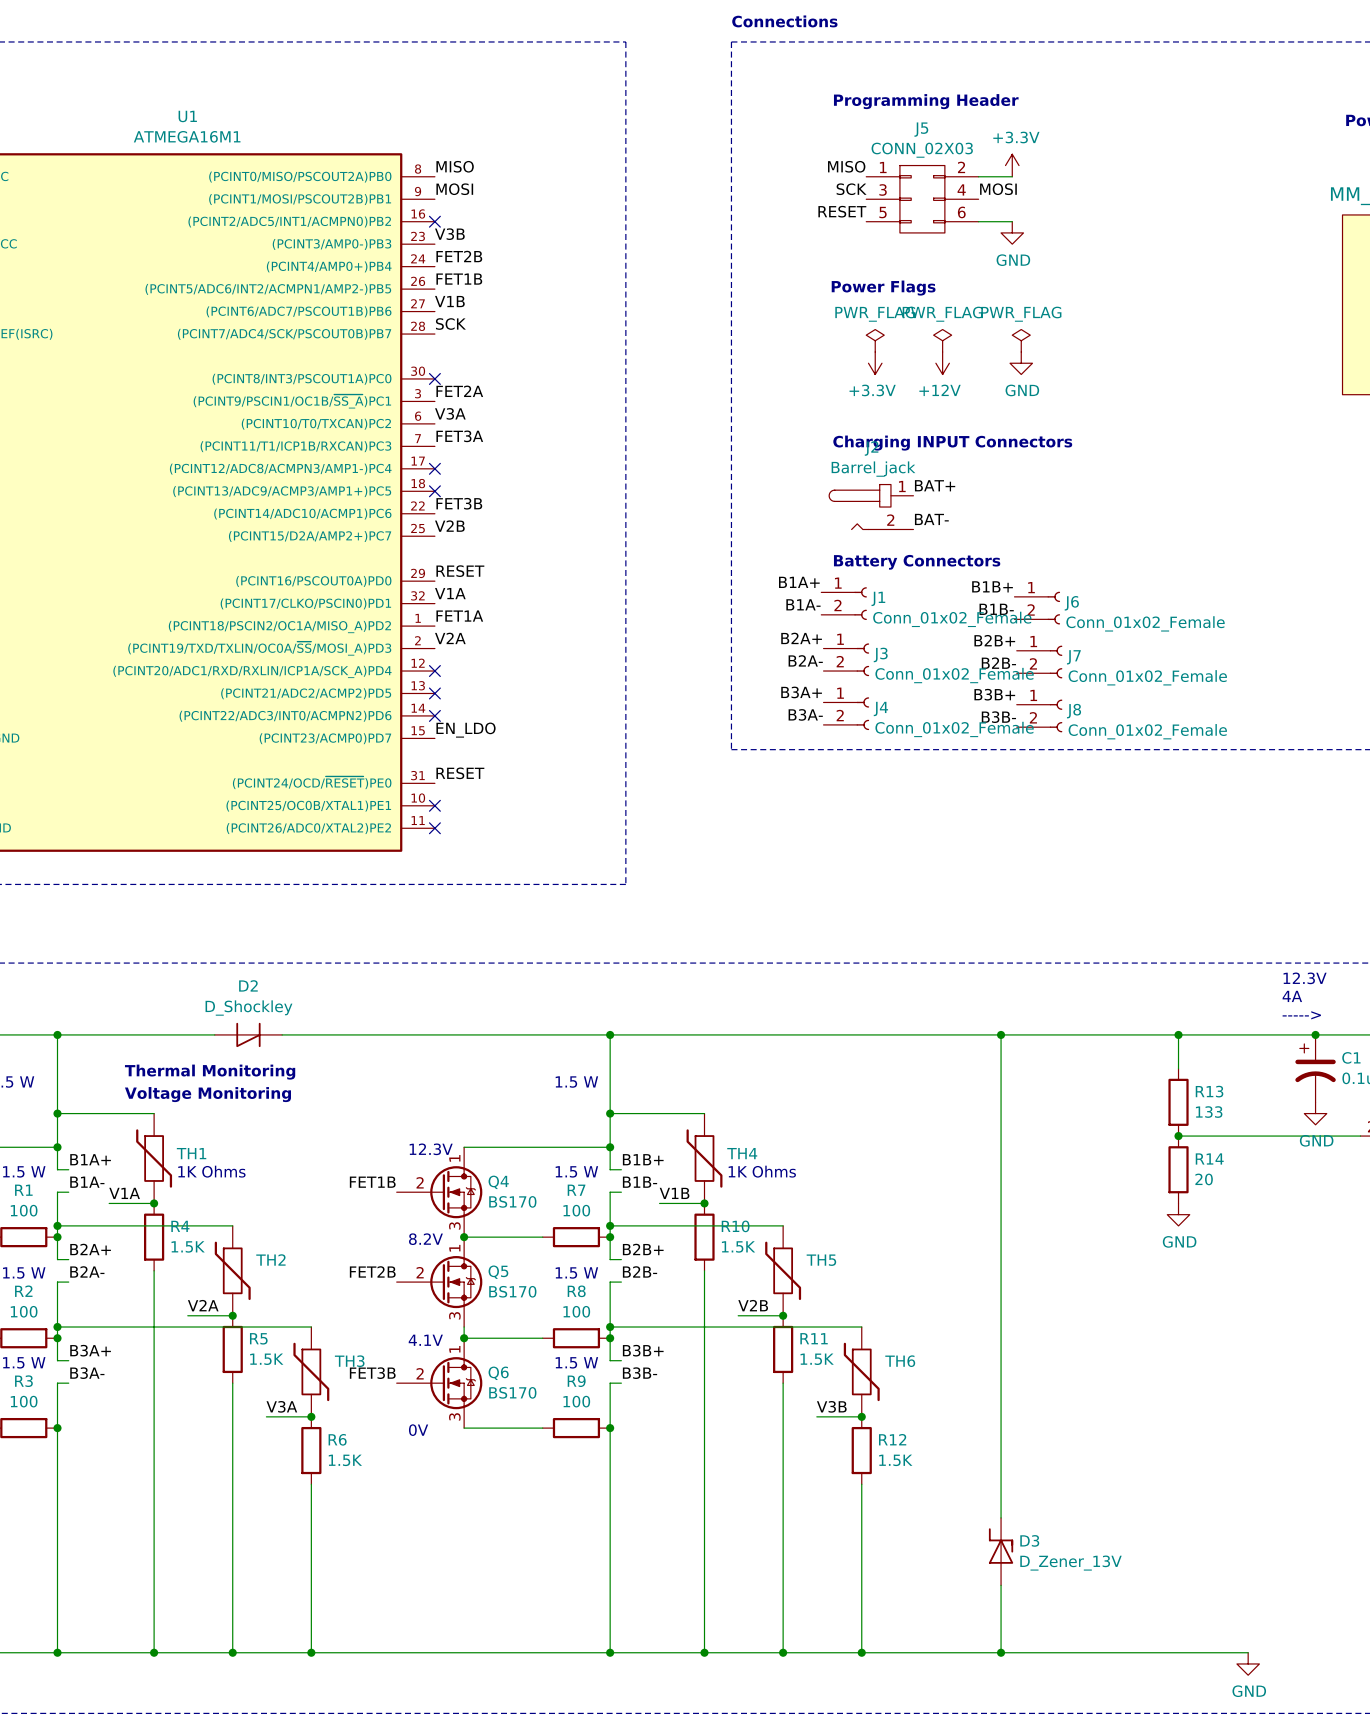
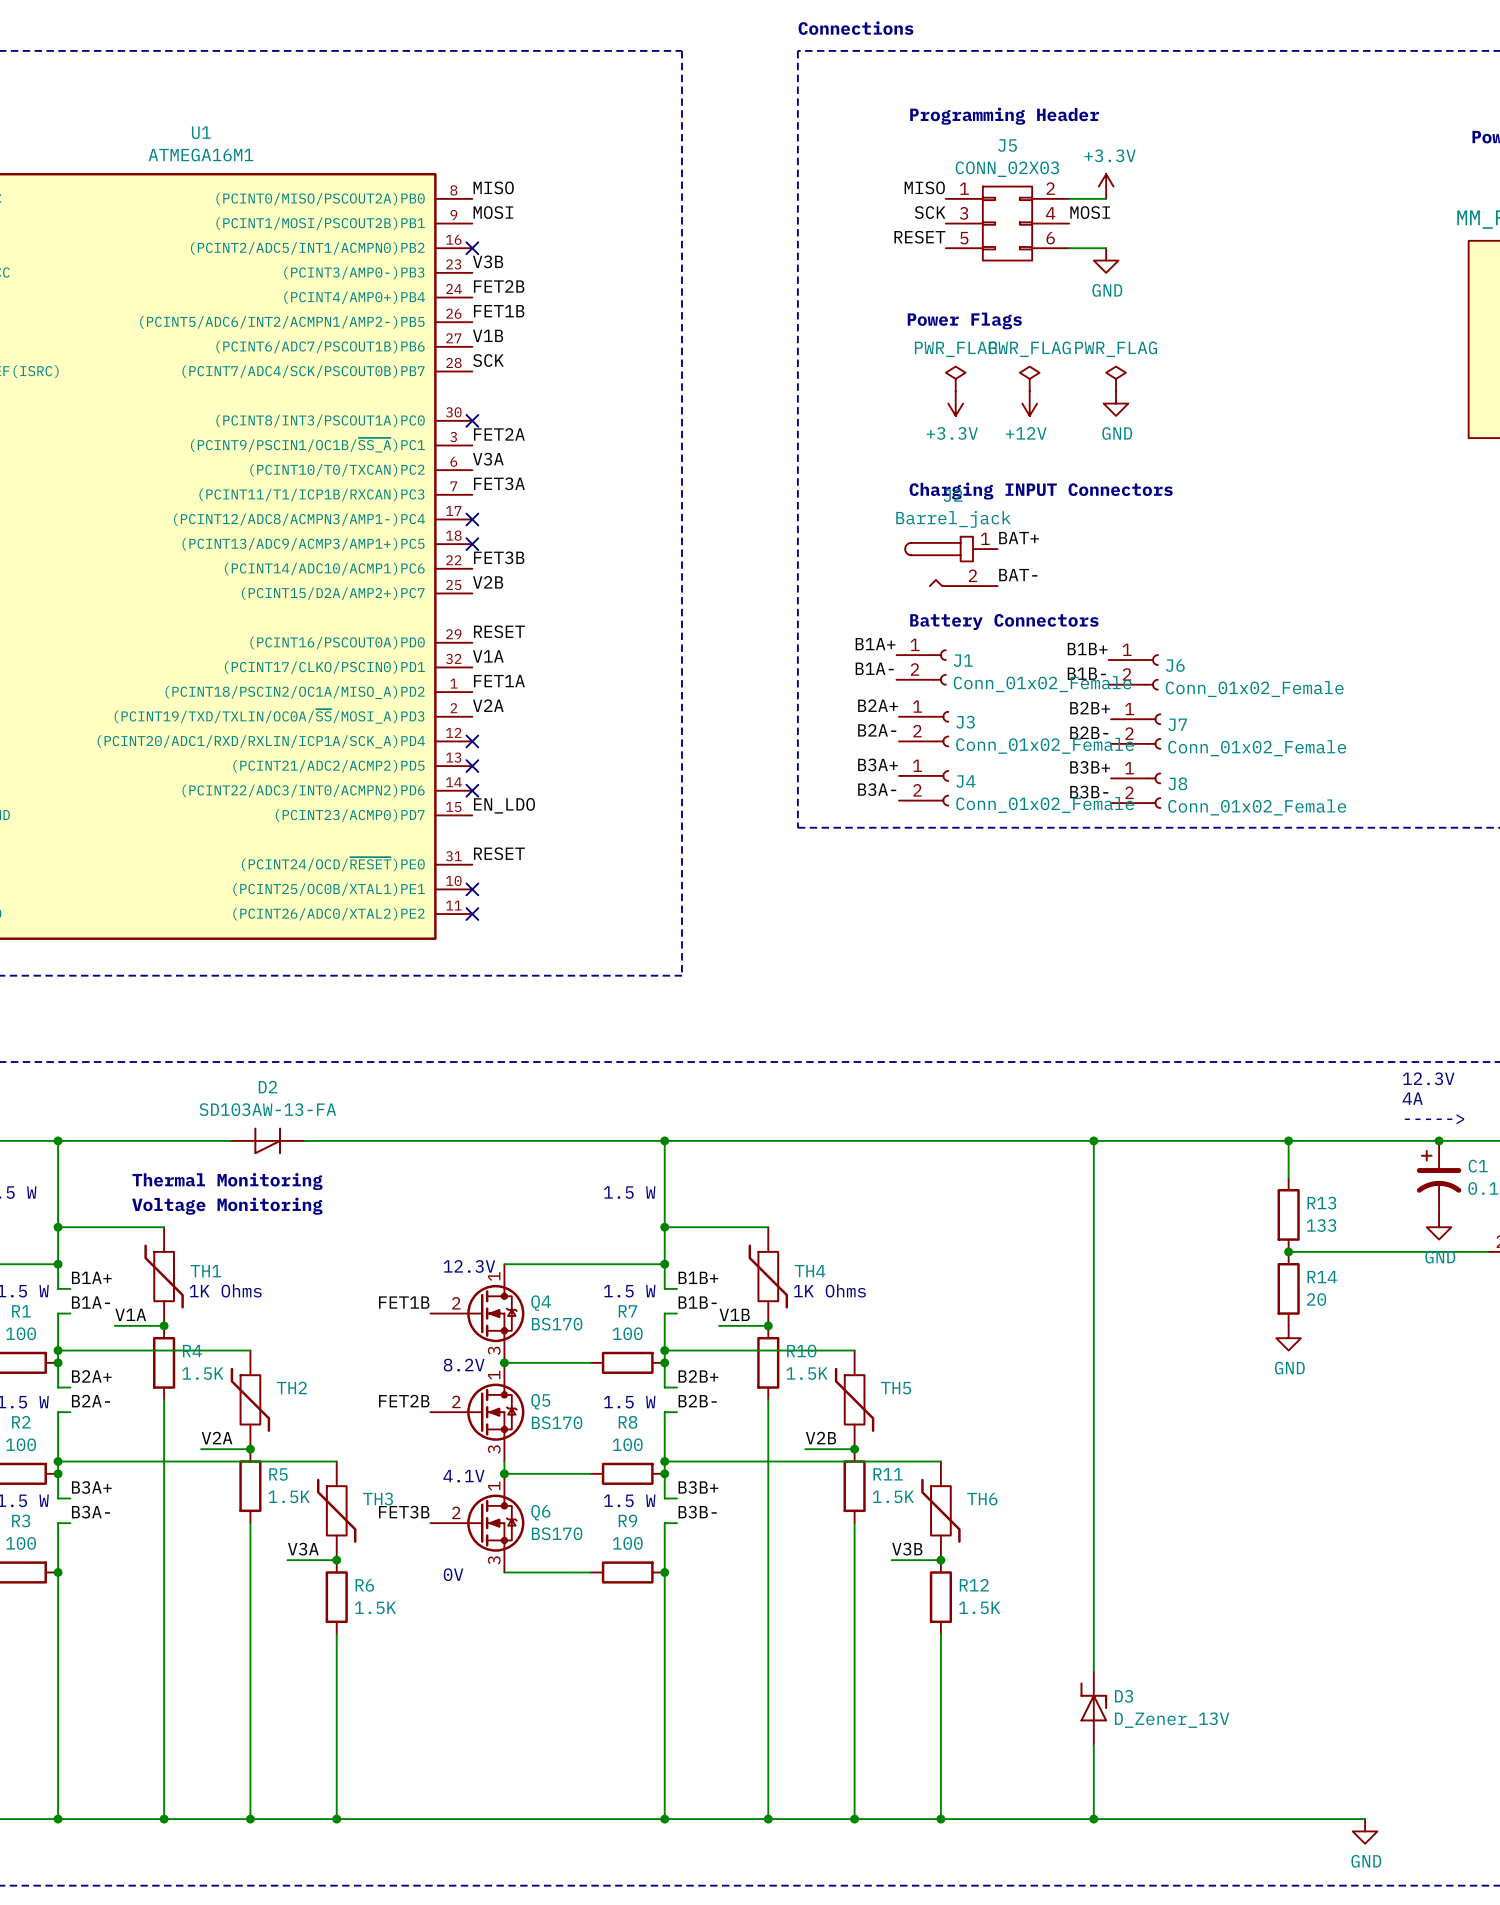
D2 value: D_Shockley (248, 1008) -> SD103AW-13-FA (267, 1109)

